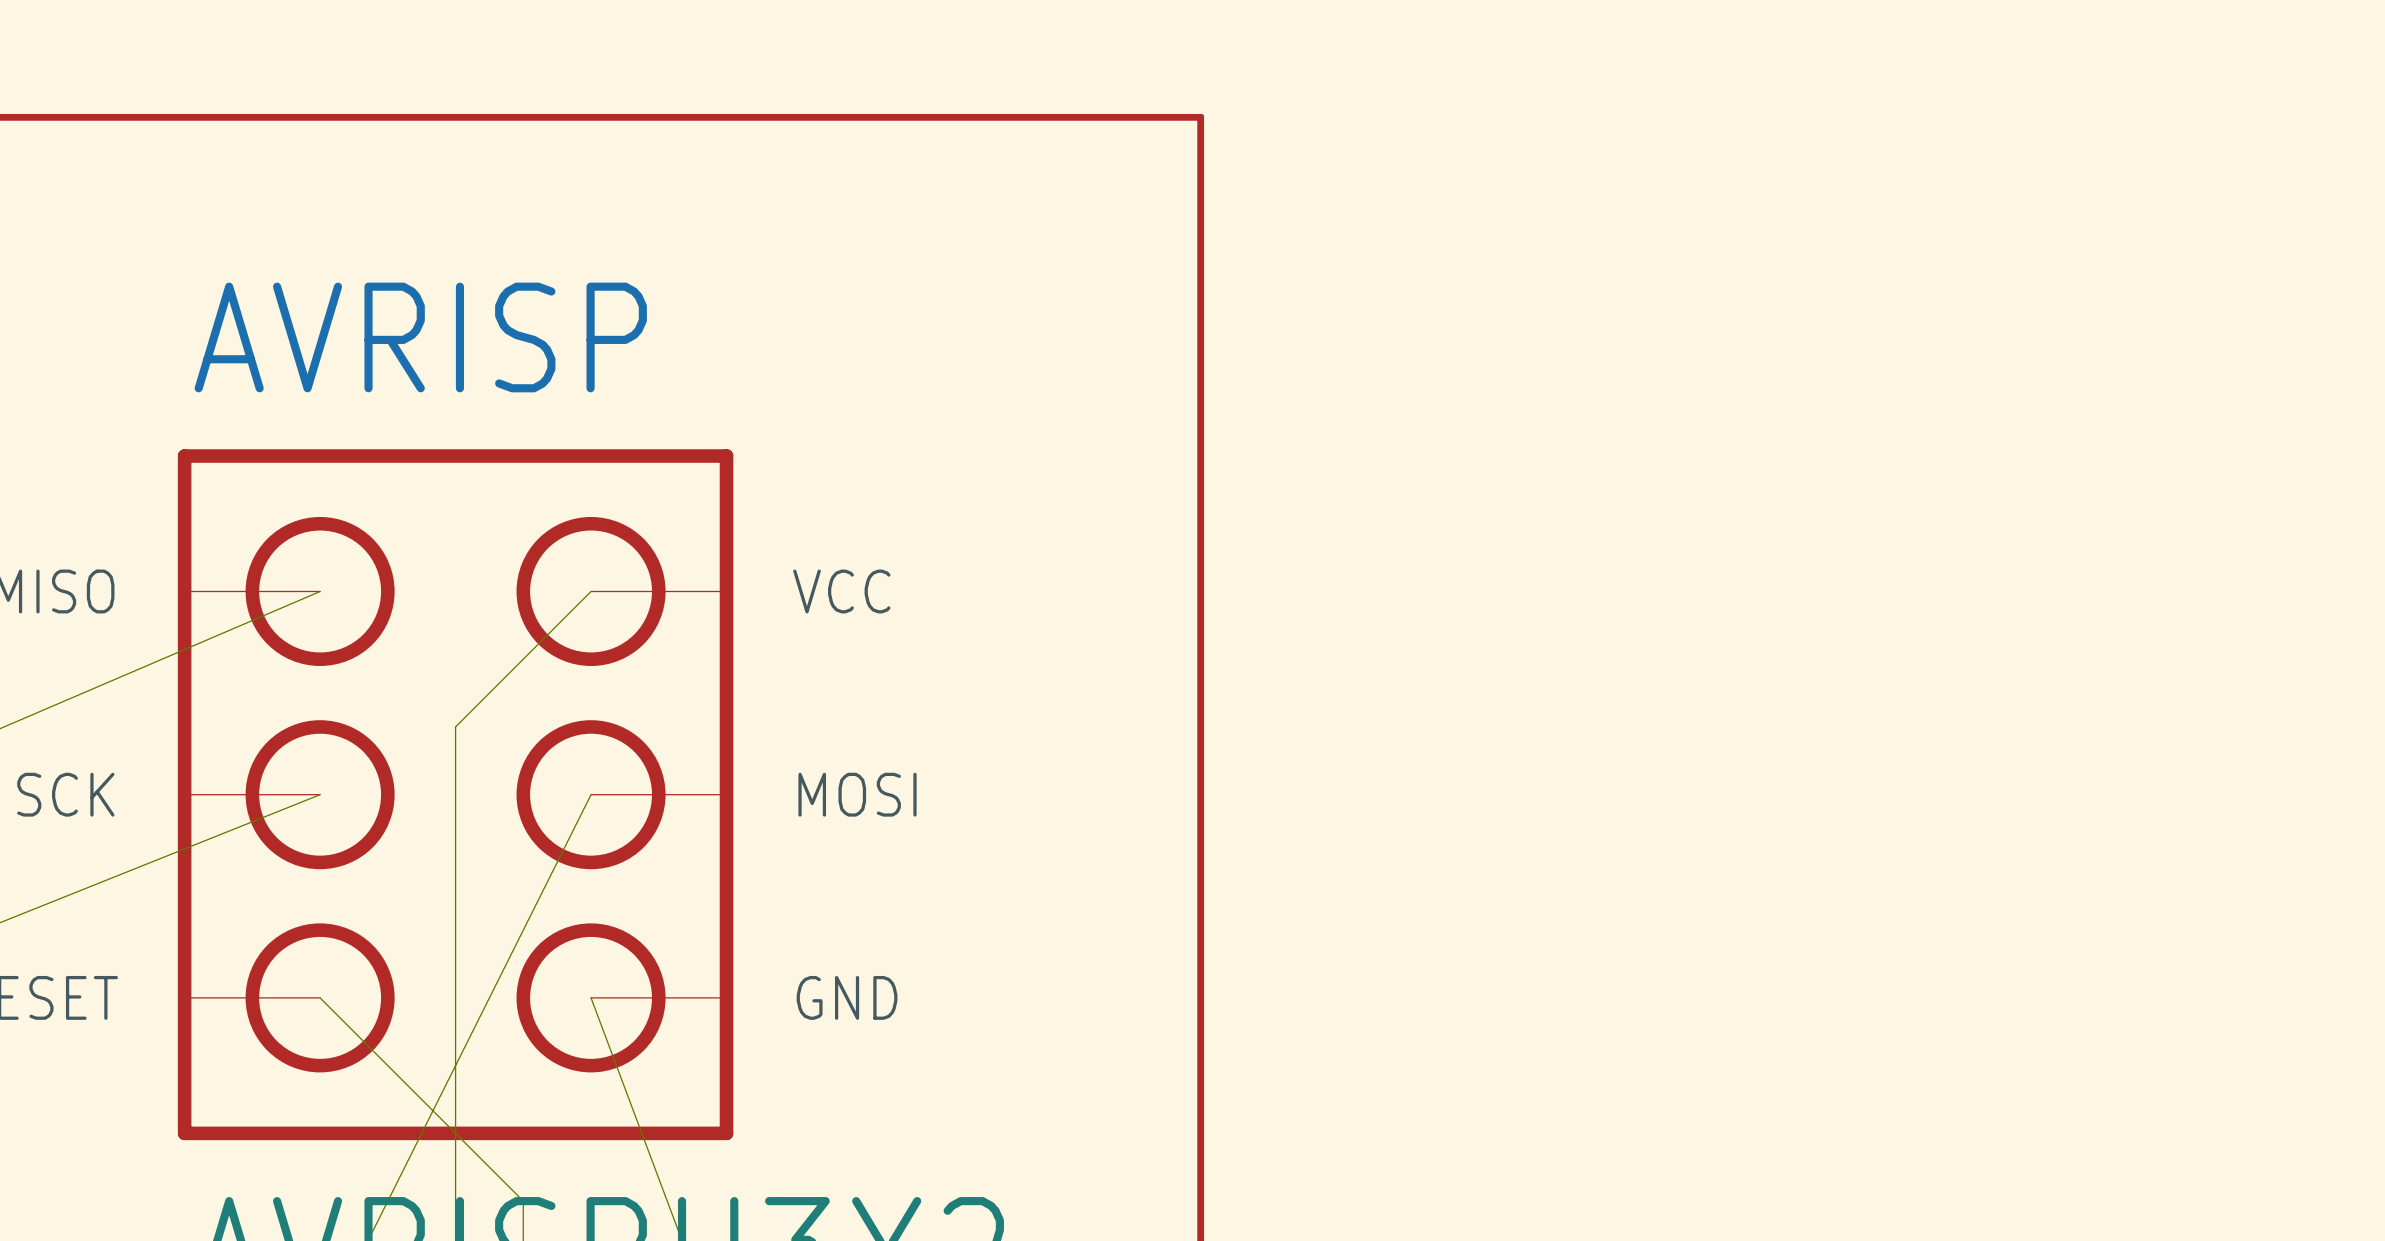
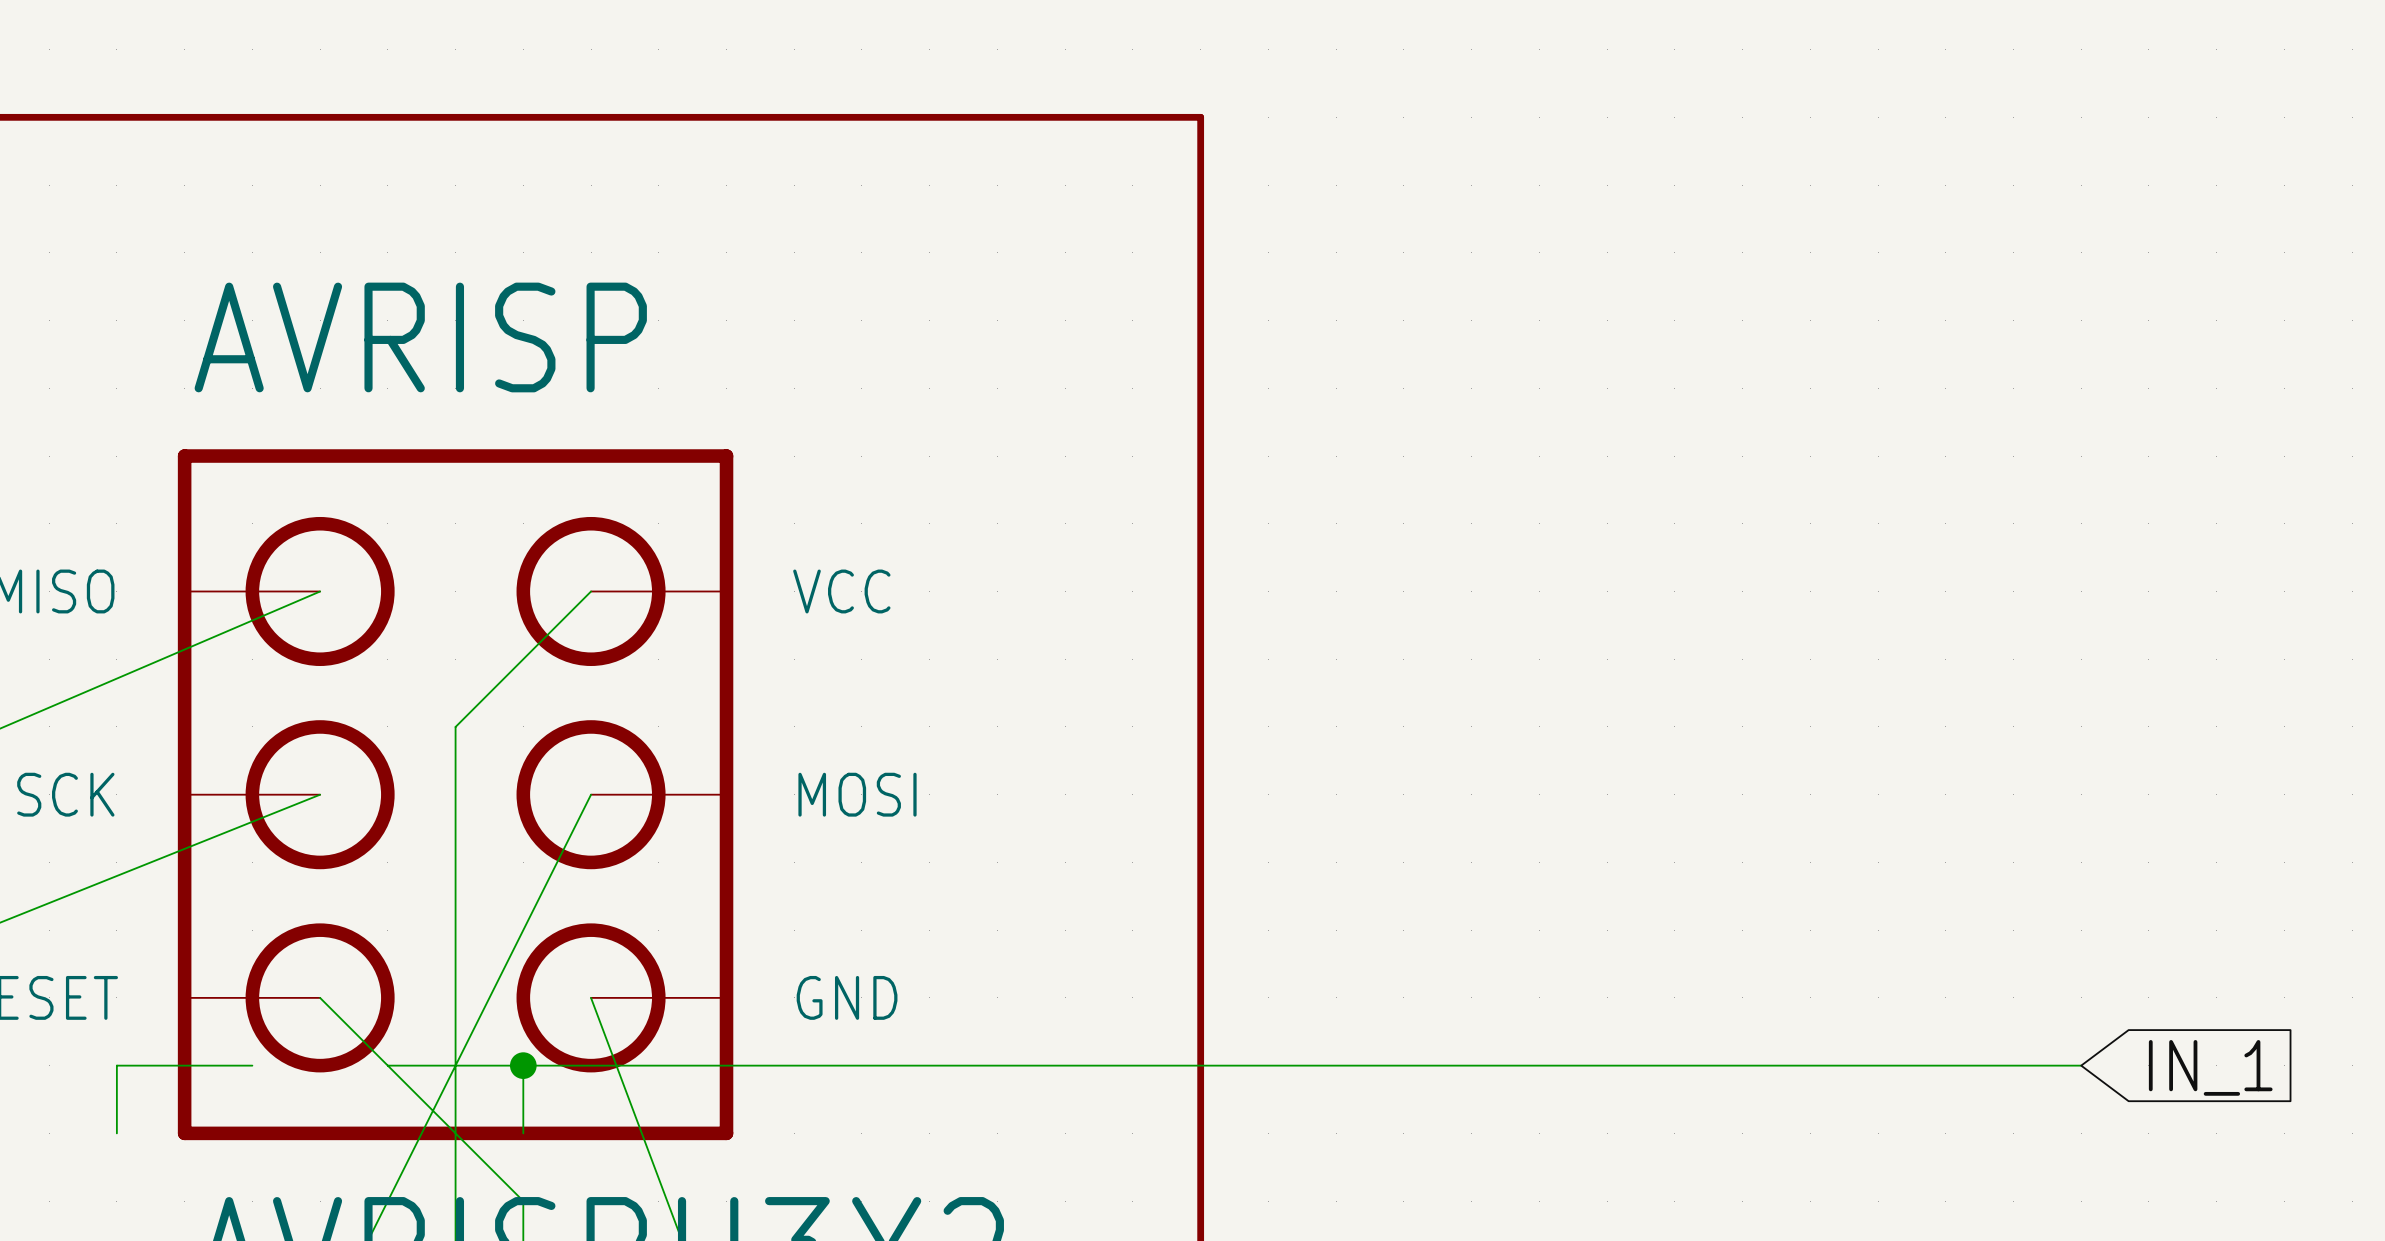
wire: none -> (252, 1065) (116, 1065) (116, 1133)
wire: none -> (387, 1065) (2081, 1065)
wire: none -> (523, 1065) (523, 1133)
junction: none -> (523, 1065)
global label: none -> IN_1 (2210, 1067)

